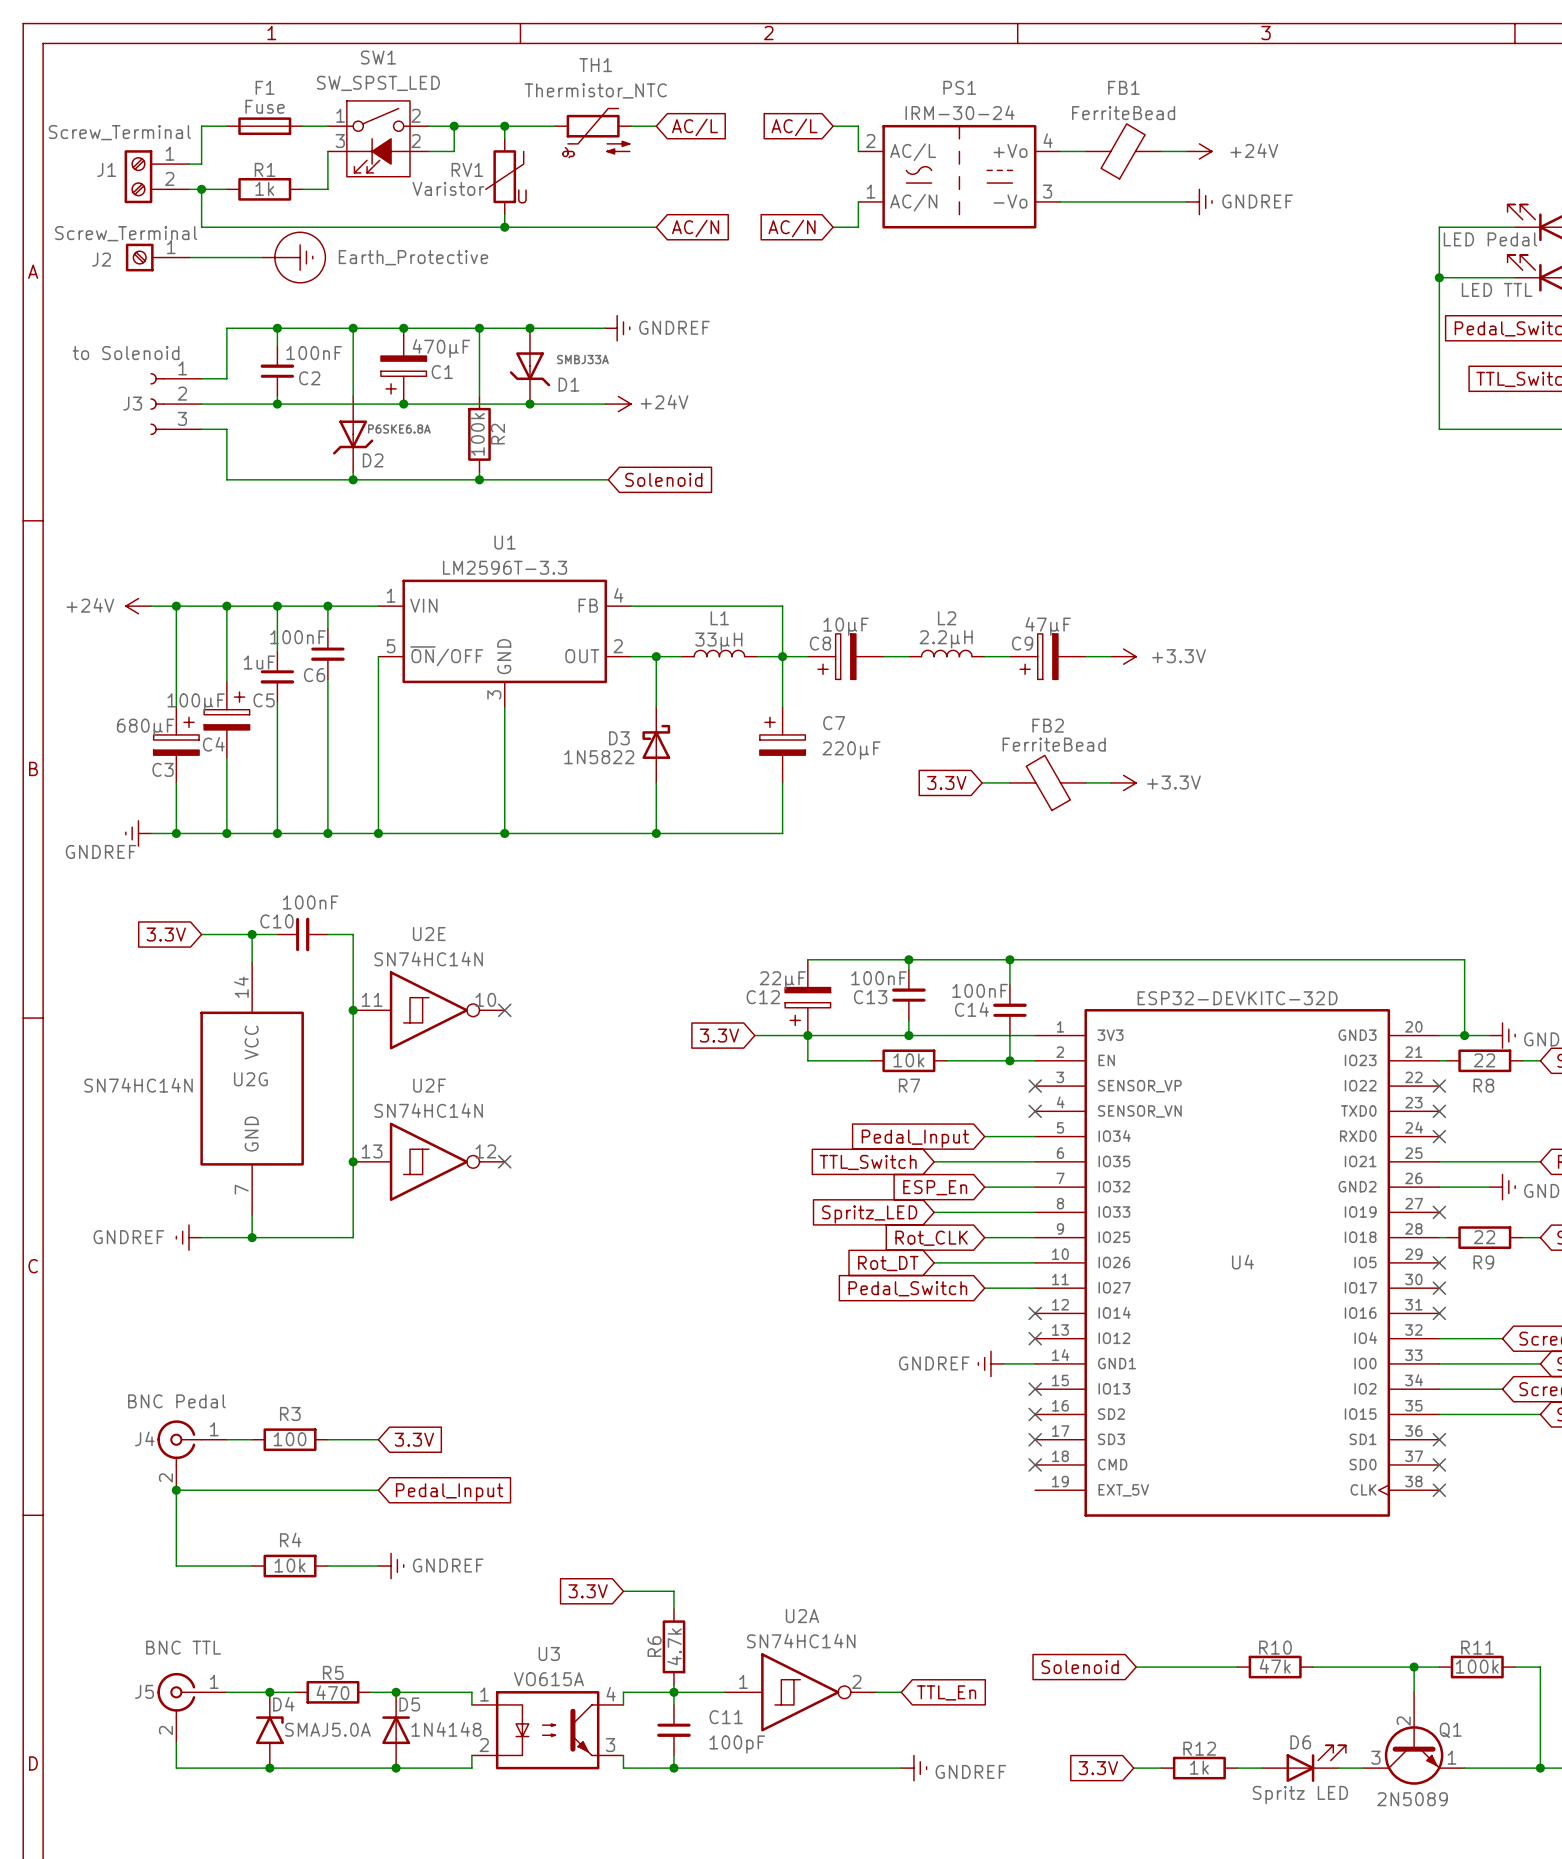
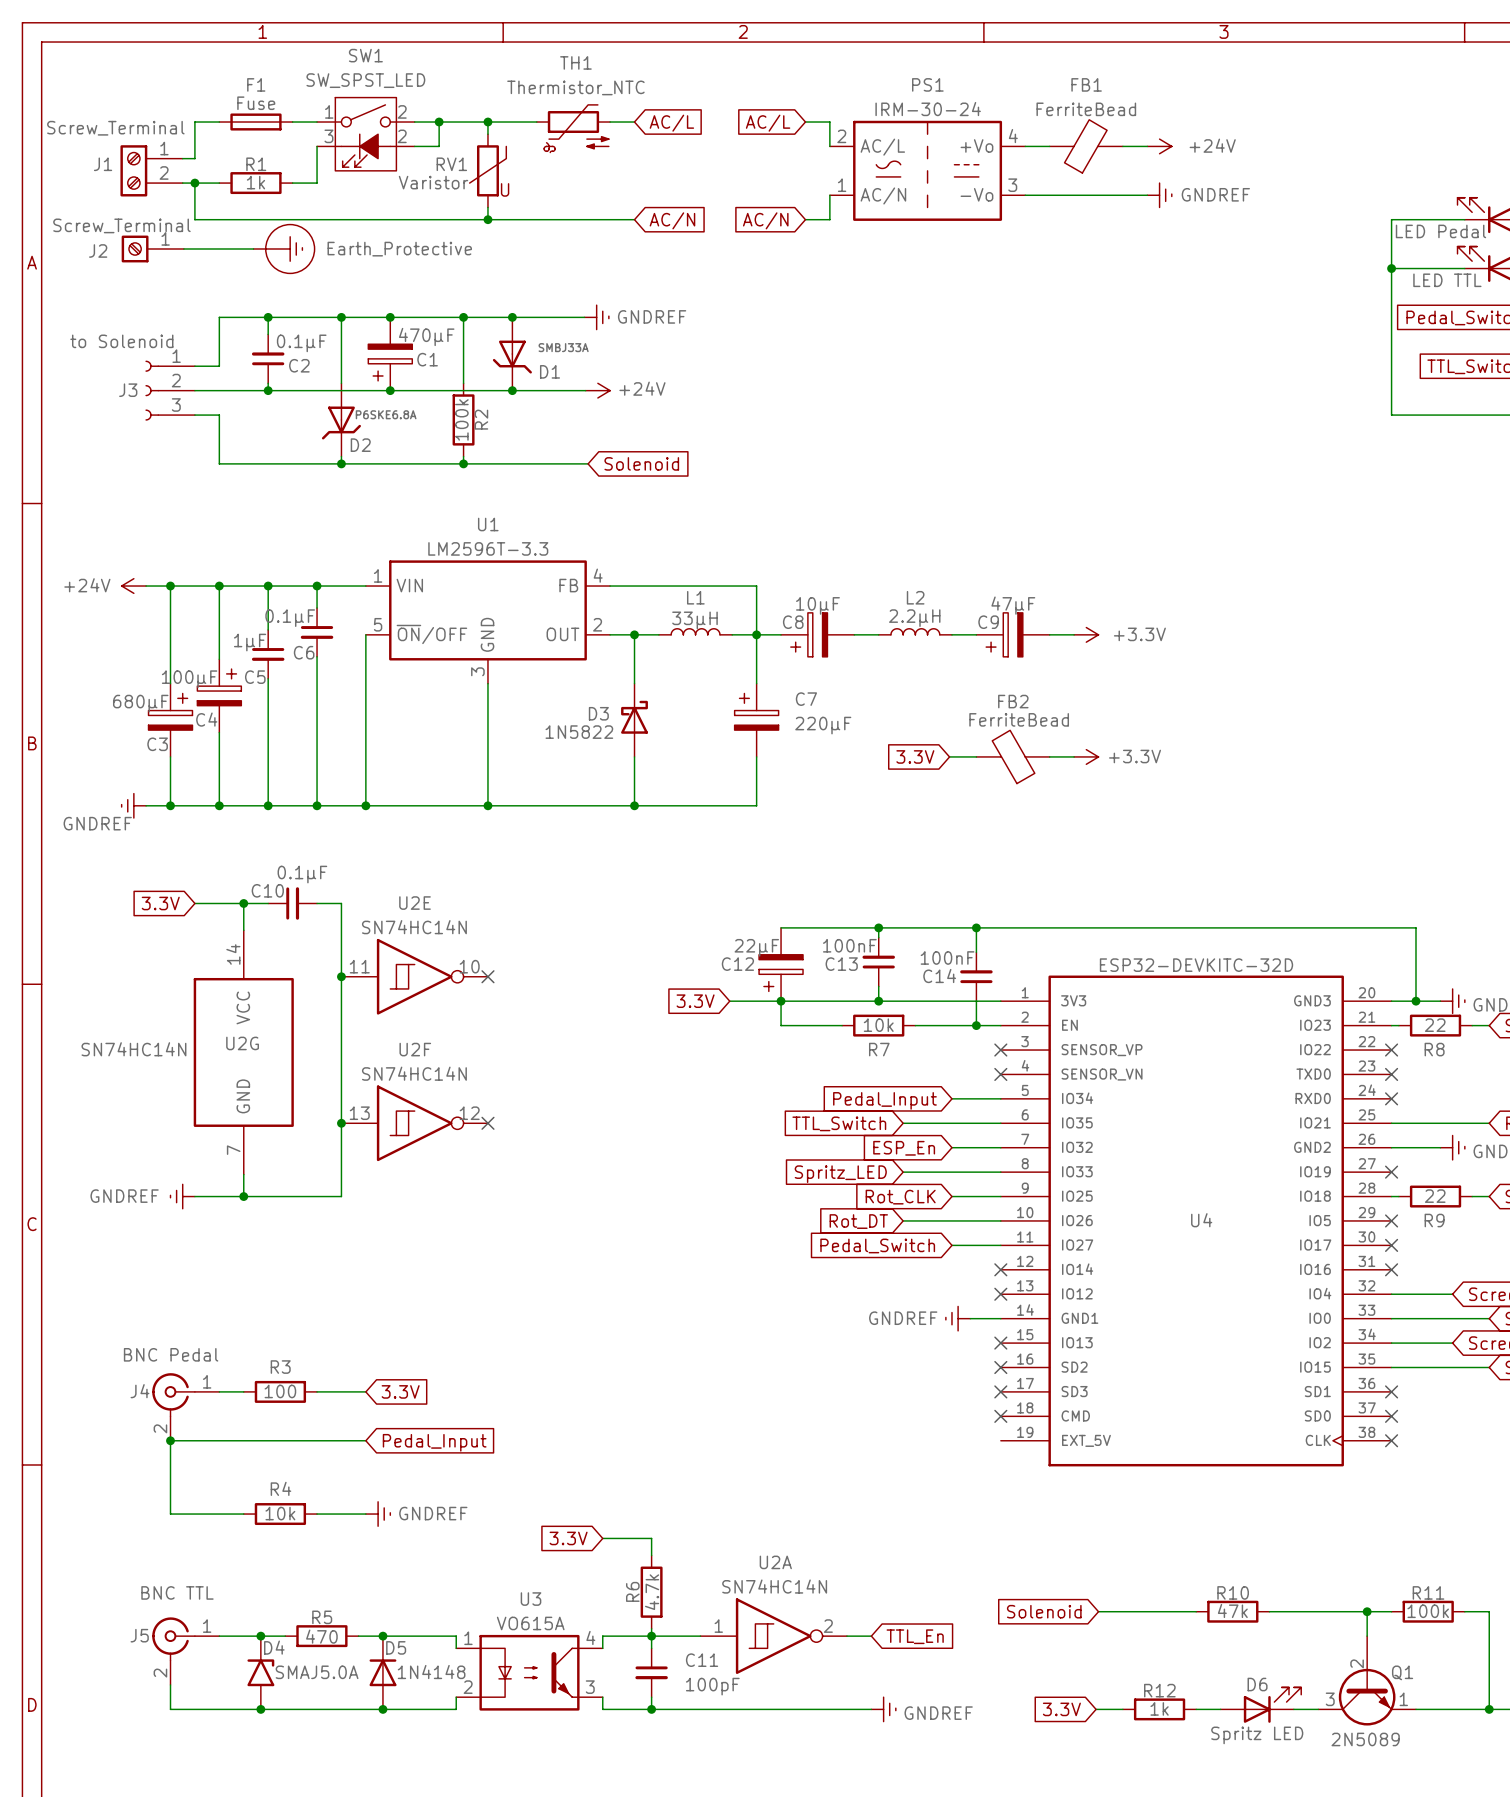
C2 value: 100nF (314, 353) -> 0.1μF (301, 343)
C6 value: 100nF (298, 637) -> 0.1μF (290, 618)
C5 value: 1uF (259, 662) -> 1μF (250, 642)
C10 value: 100nF (310, 902) -> 0.1μF (302, 874)

